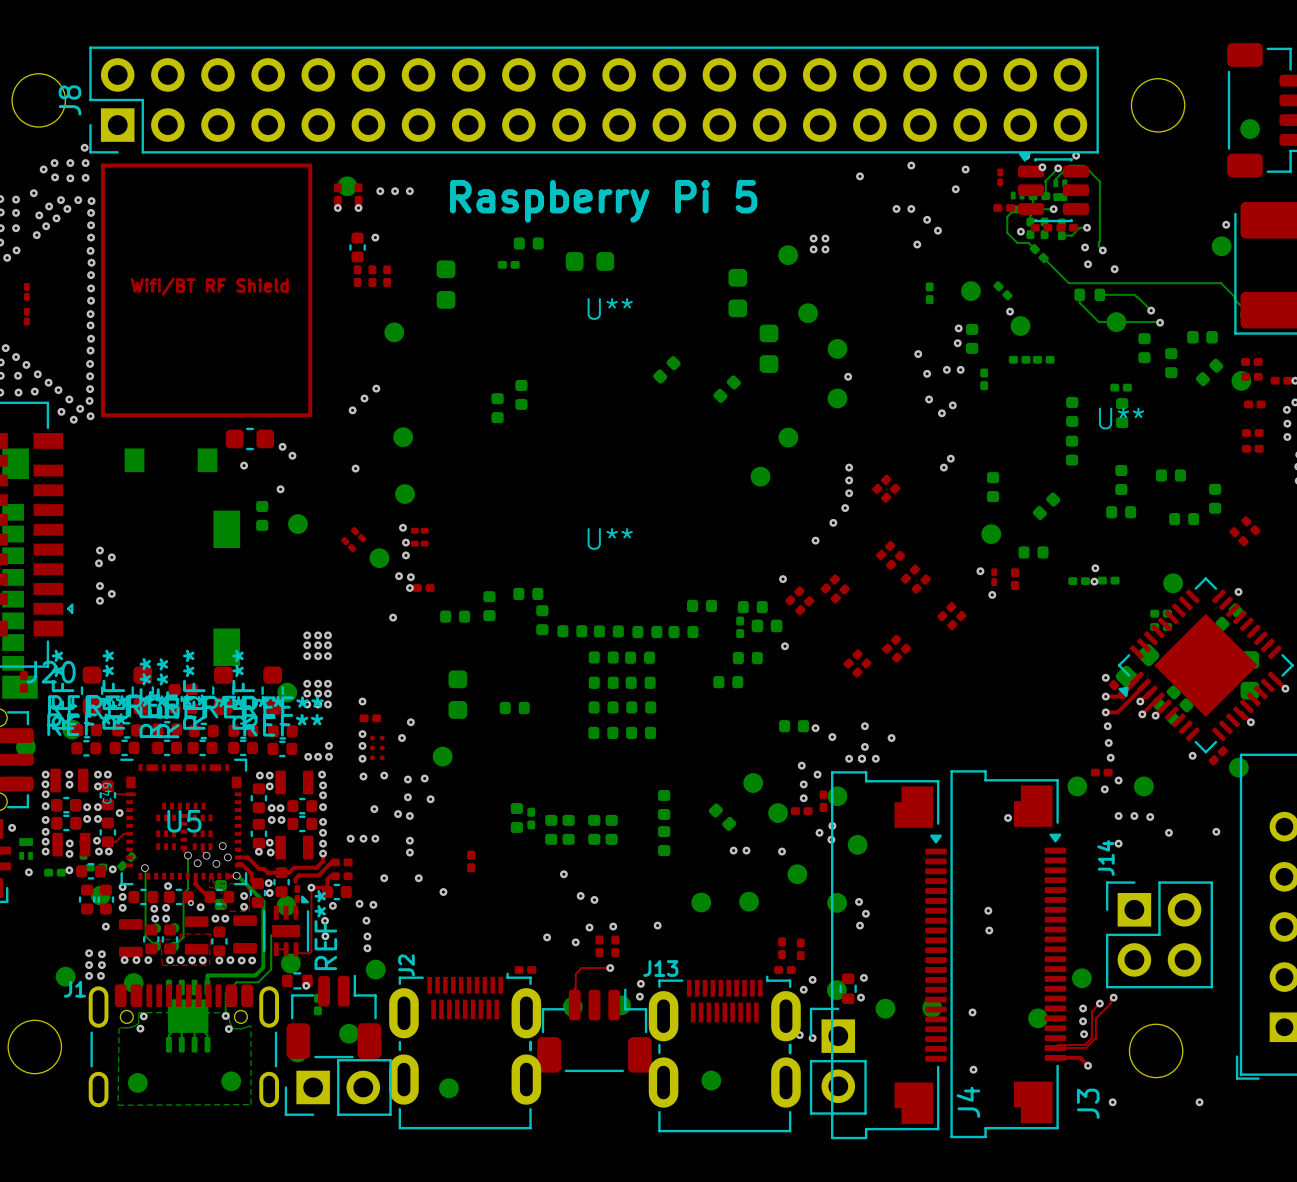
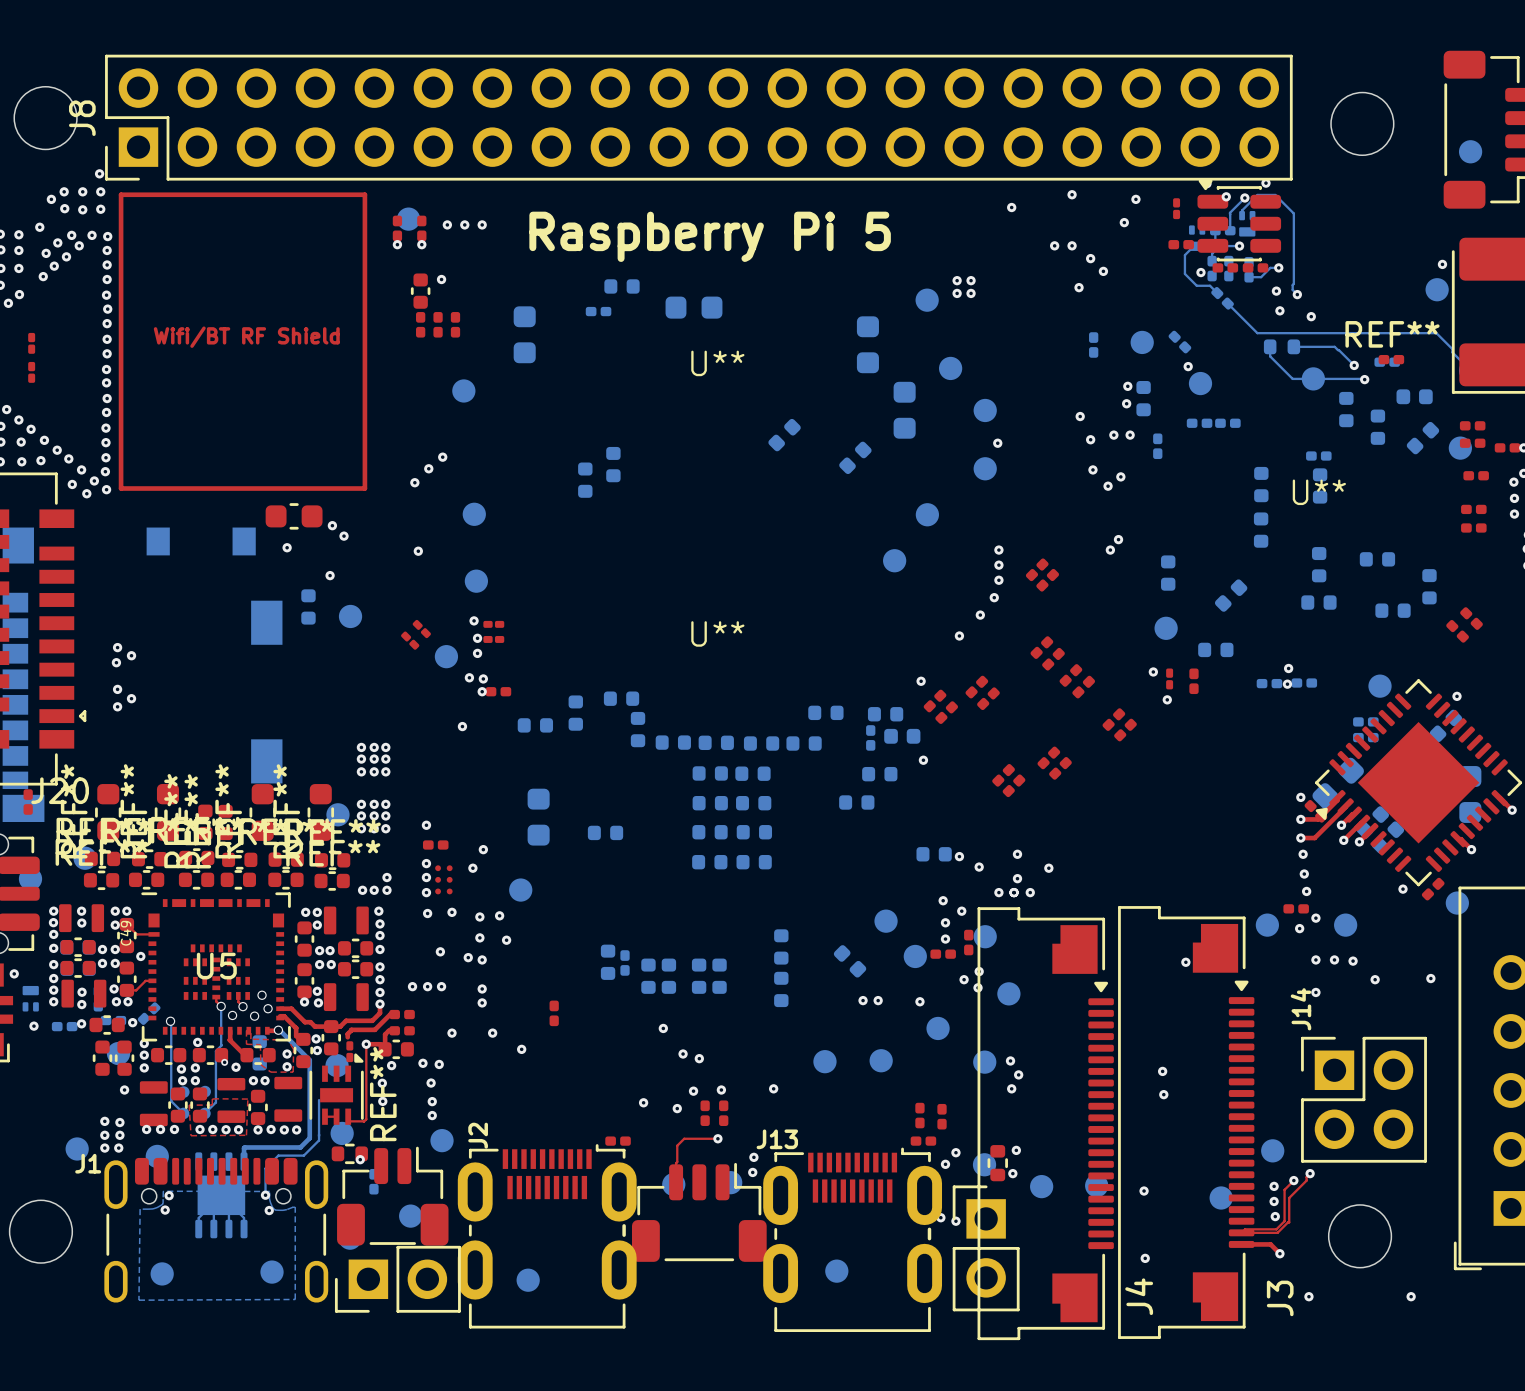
REF**: none -> (1391, 359)
part: none -> (1387, 362)

